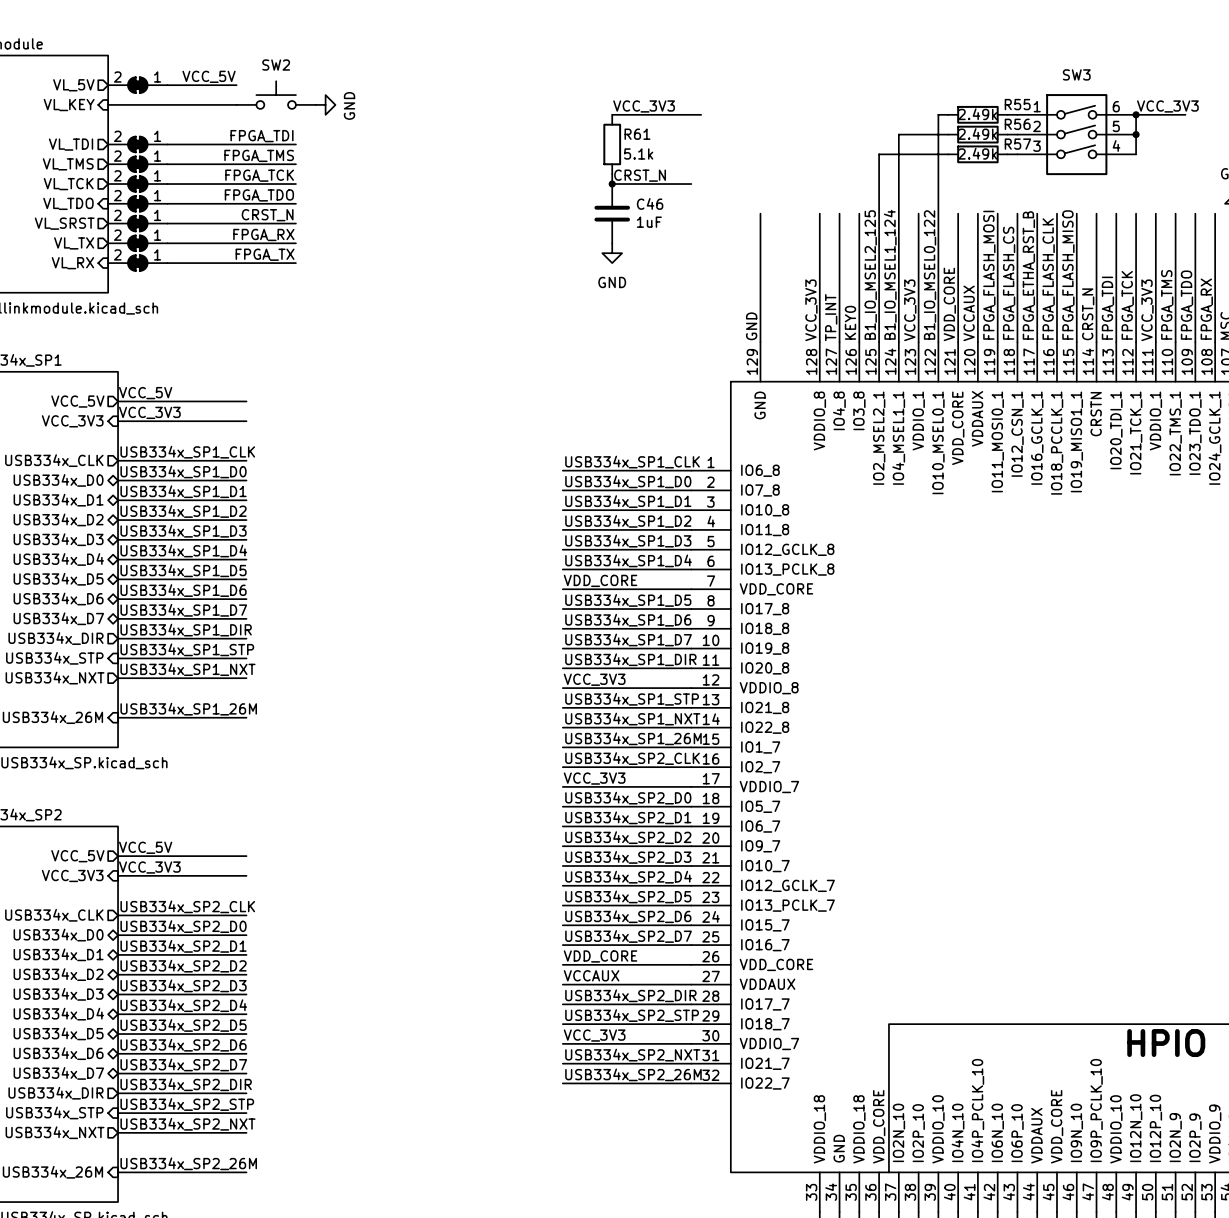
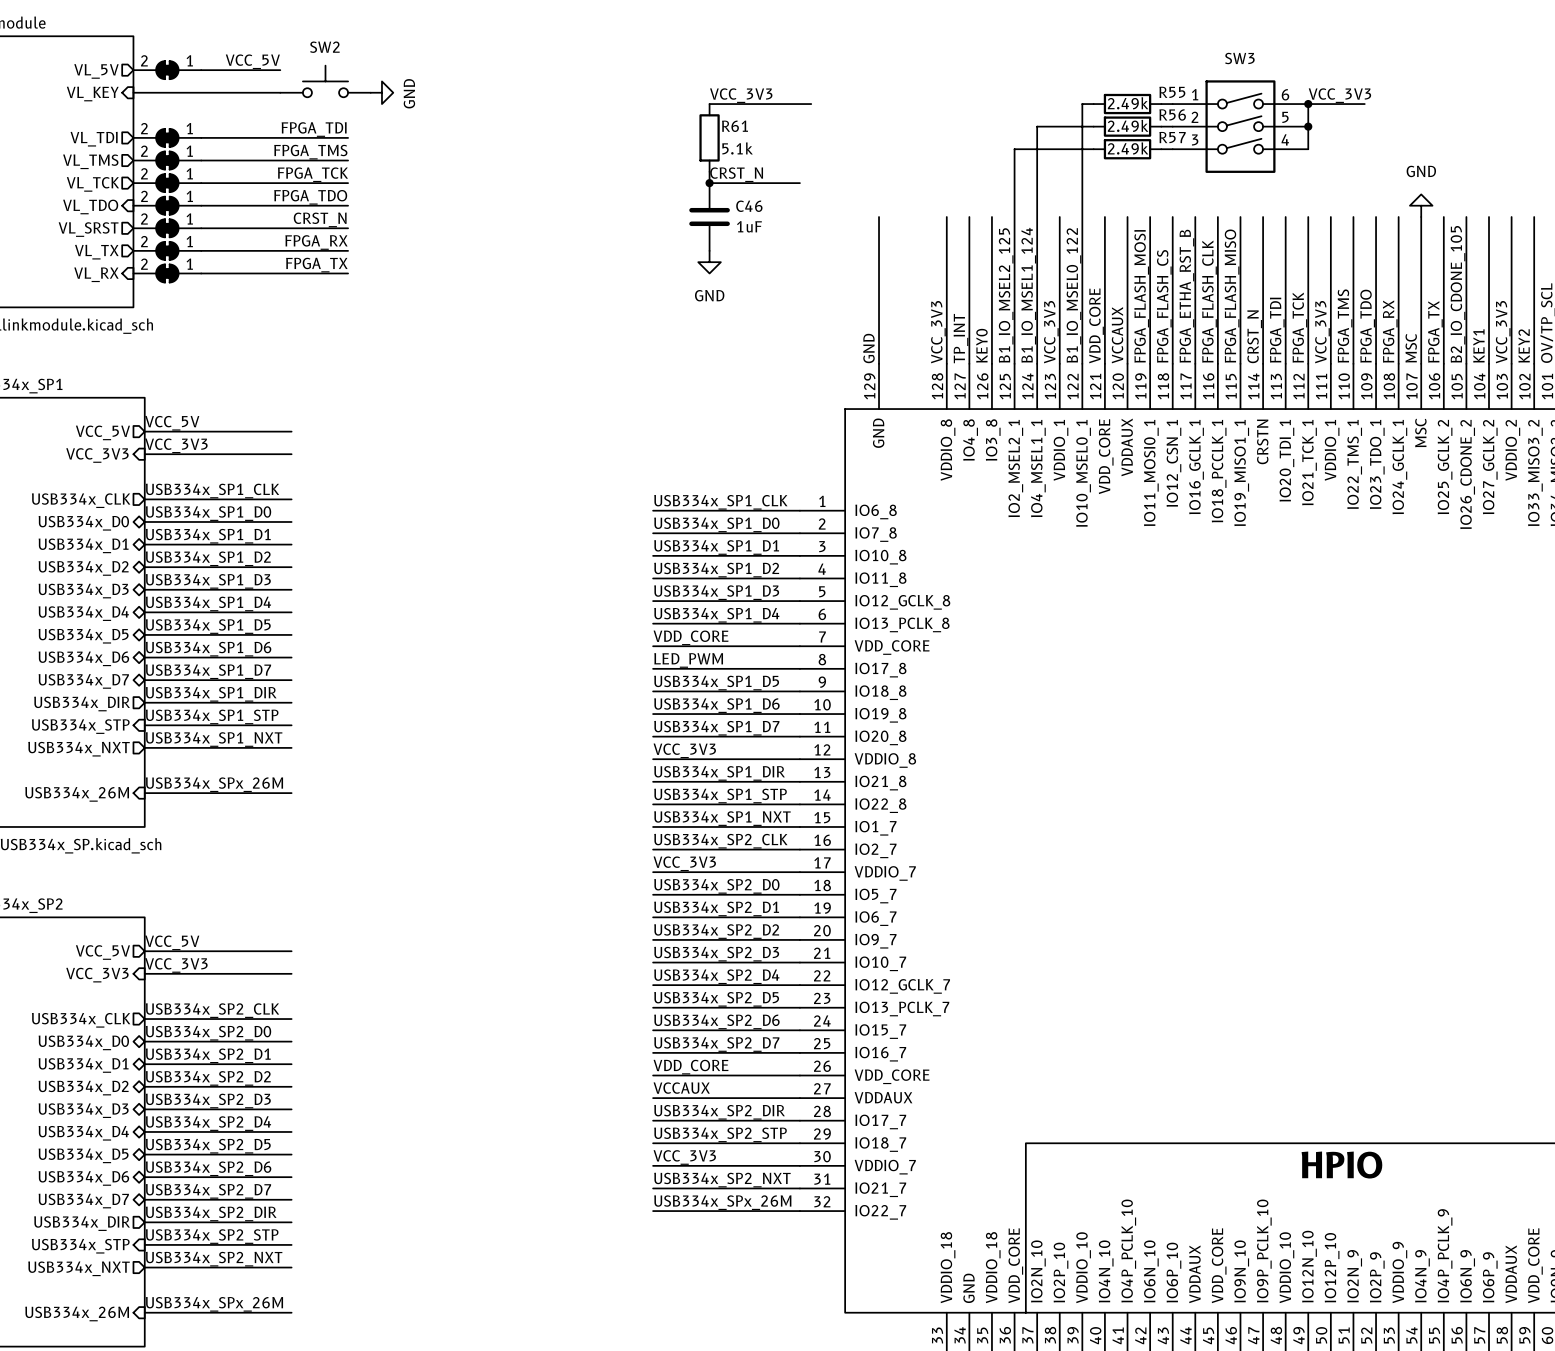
label: USB334x_SP1_D5 (628, 600) -> LED_PWM (688, 660)
label: USB334x_SP1_D6 (628, 620) -> USB334x_SP1_D5 (716, 683)
label: USB334x_SP1_D7 (628, 639) -> USB334x_SP1_D6 (716, 705)
label: USB334x_SP1_DIR (630, 659) -> USB334x_SP1_D7 (716, 728)
label: USB334x_SP1_STP (632, 699) -> USB334x_SP1_DIR (719, 773)
label: USB334x_SP1_26M (188, 709) -> USB334x_SPx_26M (214, 784)
label: USB334x_SP1_NXT (632, 719) -> USB334x_SP1_STP (720, 796)
label: USB334x_SP1_26M (633, 738) -> USB334x_SP1_NXT (722, 818)
label: USB334x_SP2_26M (633, 1074) -> USB334x_SPx_26M (722, 1202)
label: USB334x_SP2_26M (188, 1163) -> USB334x_SPx_26M (214, 1304)

